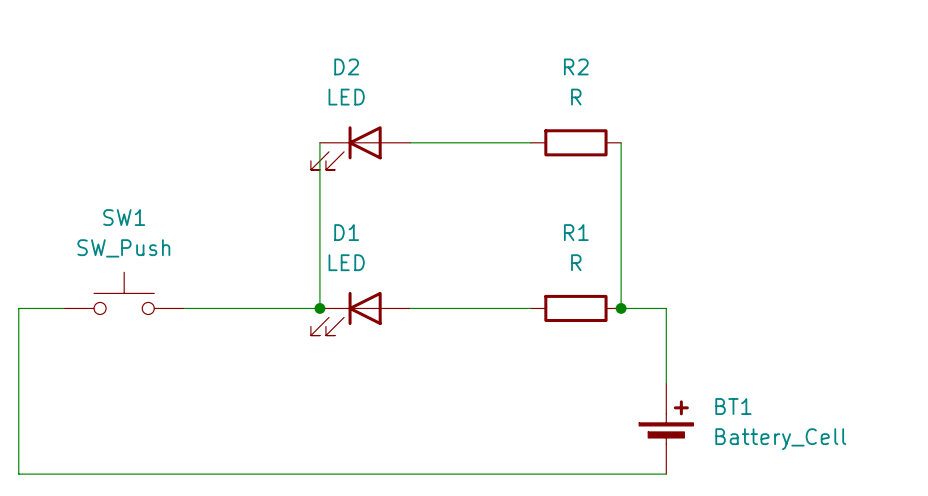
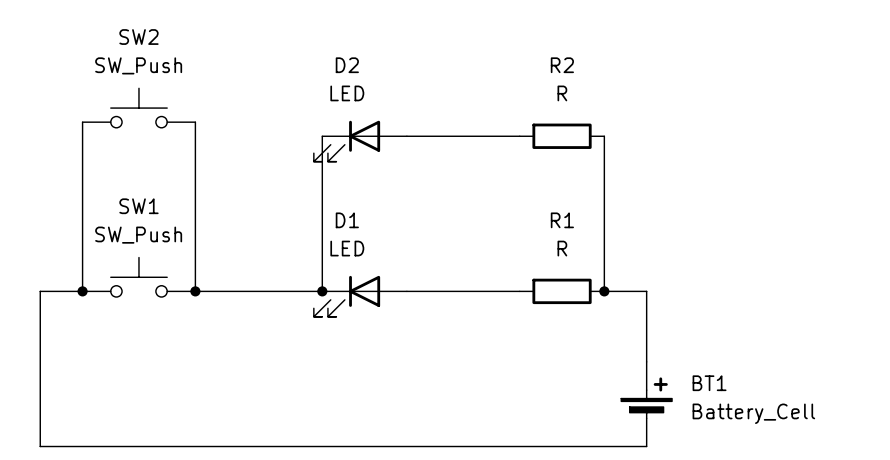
SW2: none -> SW_Push (138, 108)
wire: none -> (82, 122) (82, 291)
wire: none -> (195, 122) (195, 291)
junction: none -> (82, 291)
junction: none -> (195, 291)

